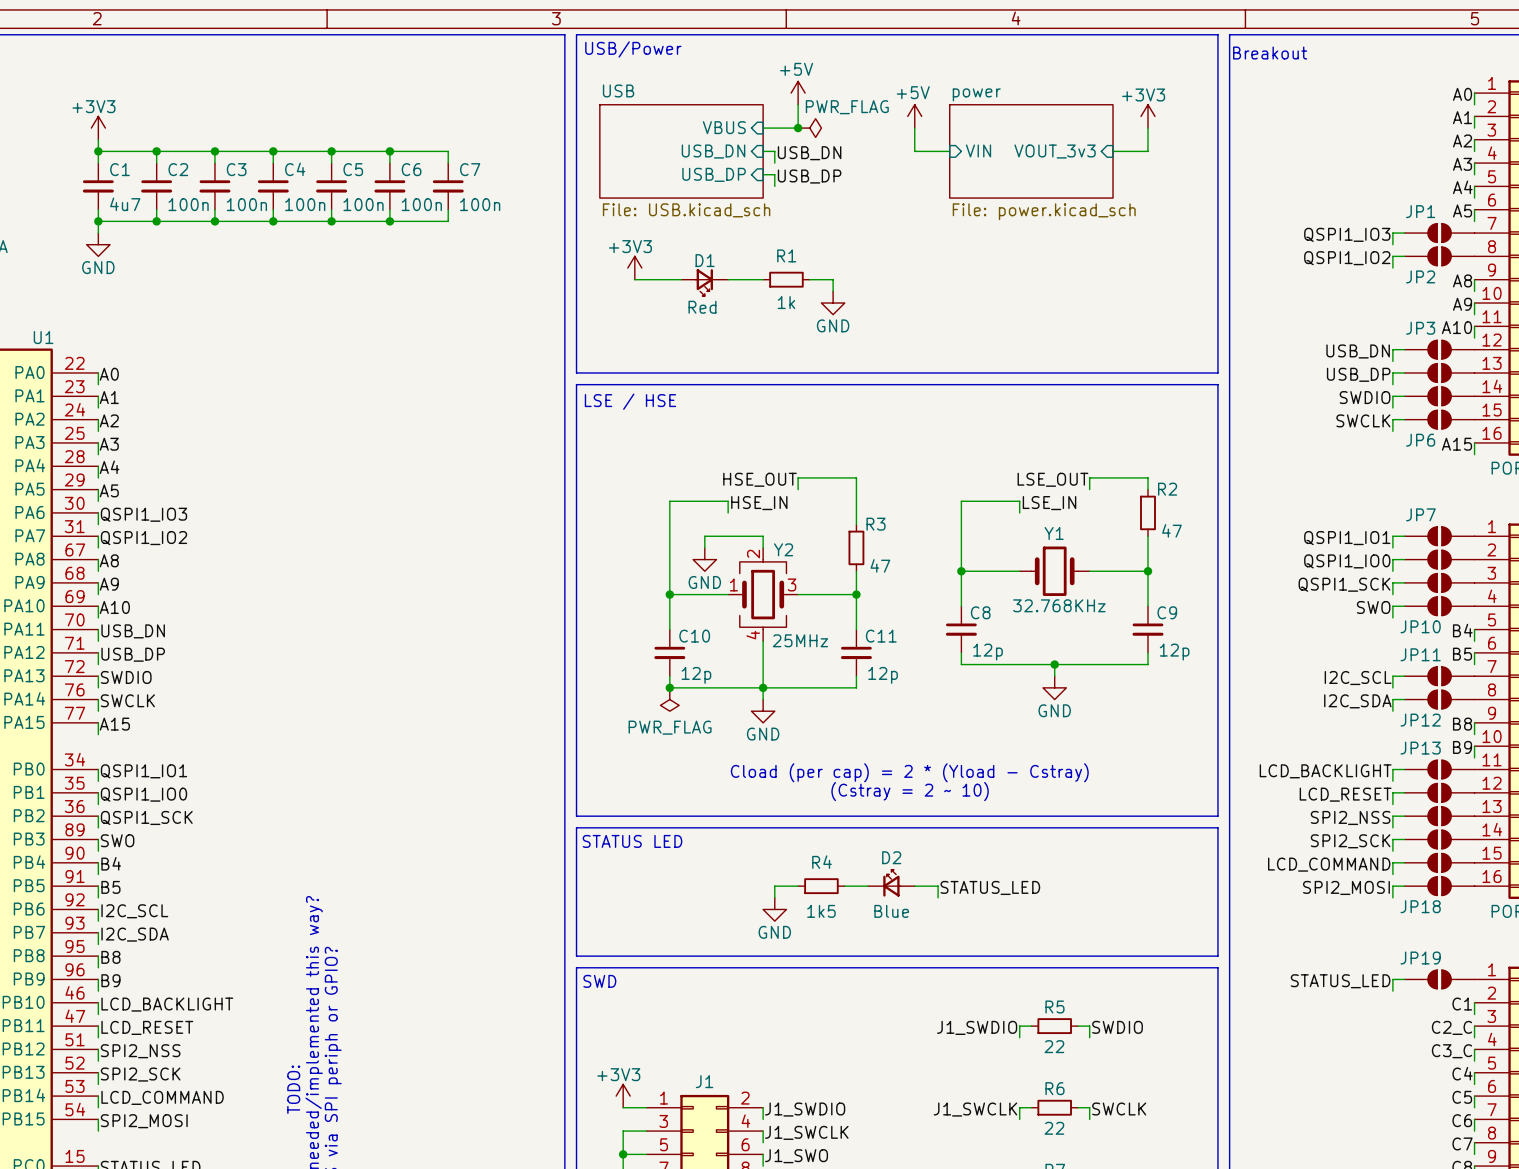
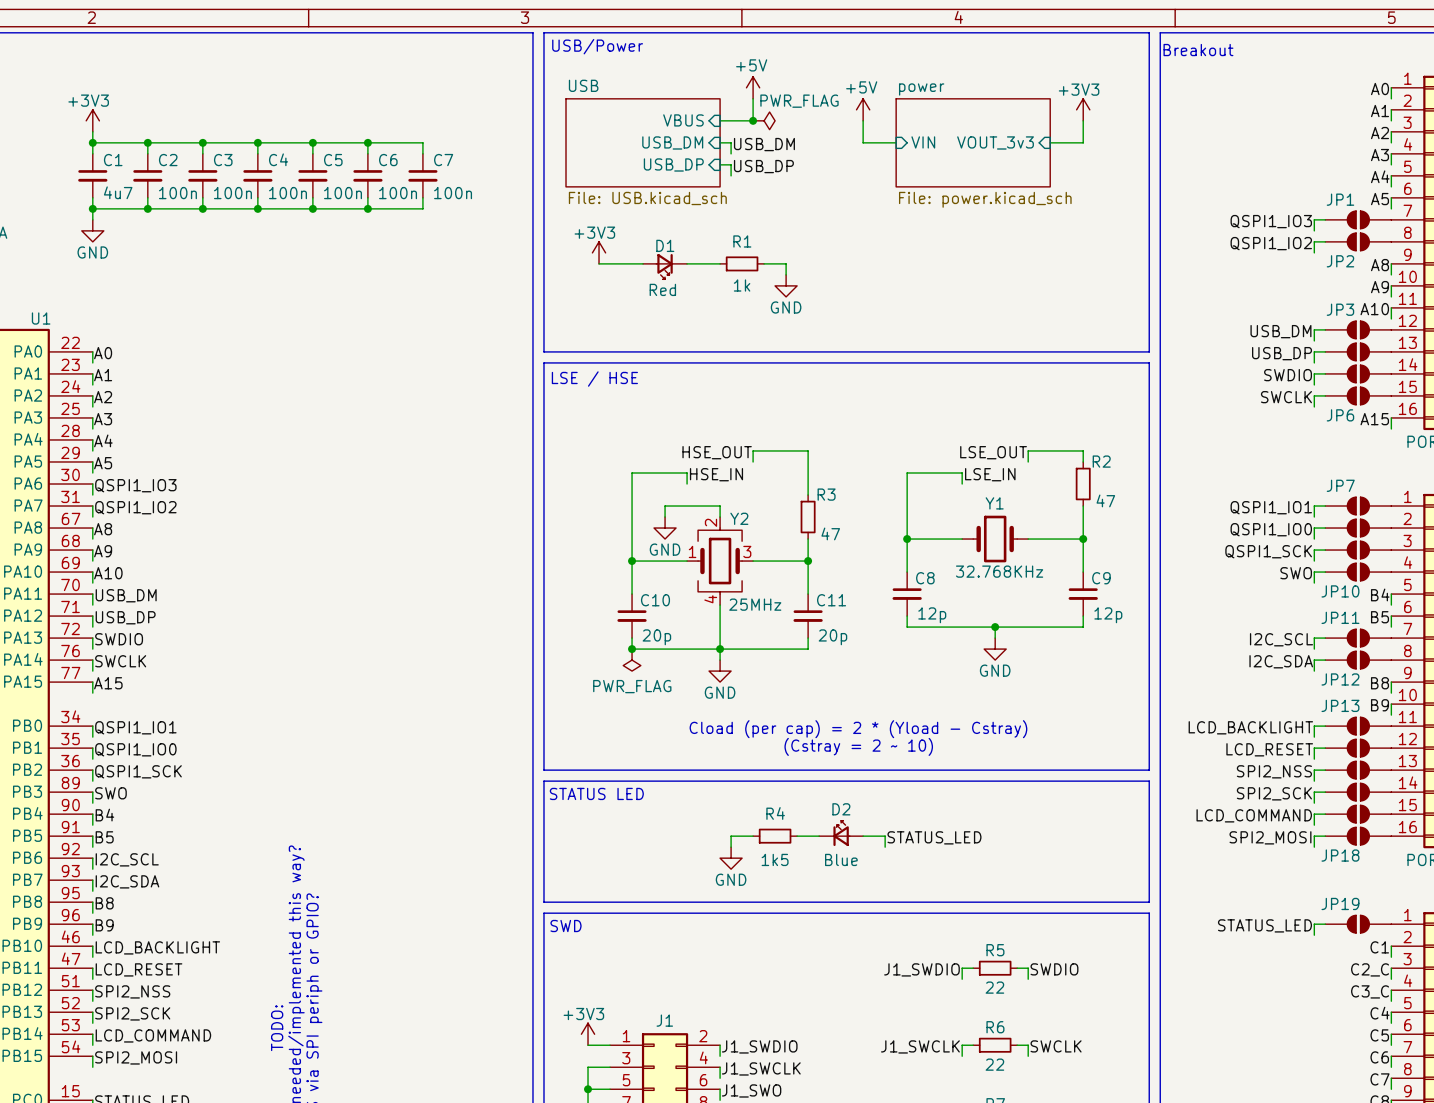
sheet pin: USB_DN (713, 151) -> USB_DM (672, 142)
label: USB_DN (809, 153) -> USB_DM (764, 144)
label: USB_DN (1358, 351) -> USB_DM (1280, 331)
label: USB_DN (133, 631) -> USB_DM (126, 595)
C10 value: 12p (696, 675) -> 20p (656, 637)
C11 value: 12p (883, 675) -> 20p (832, 637)

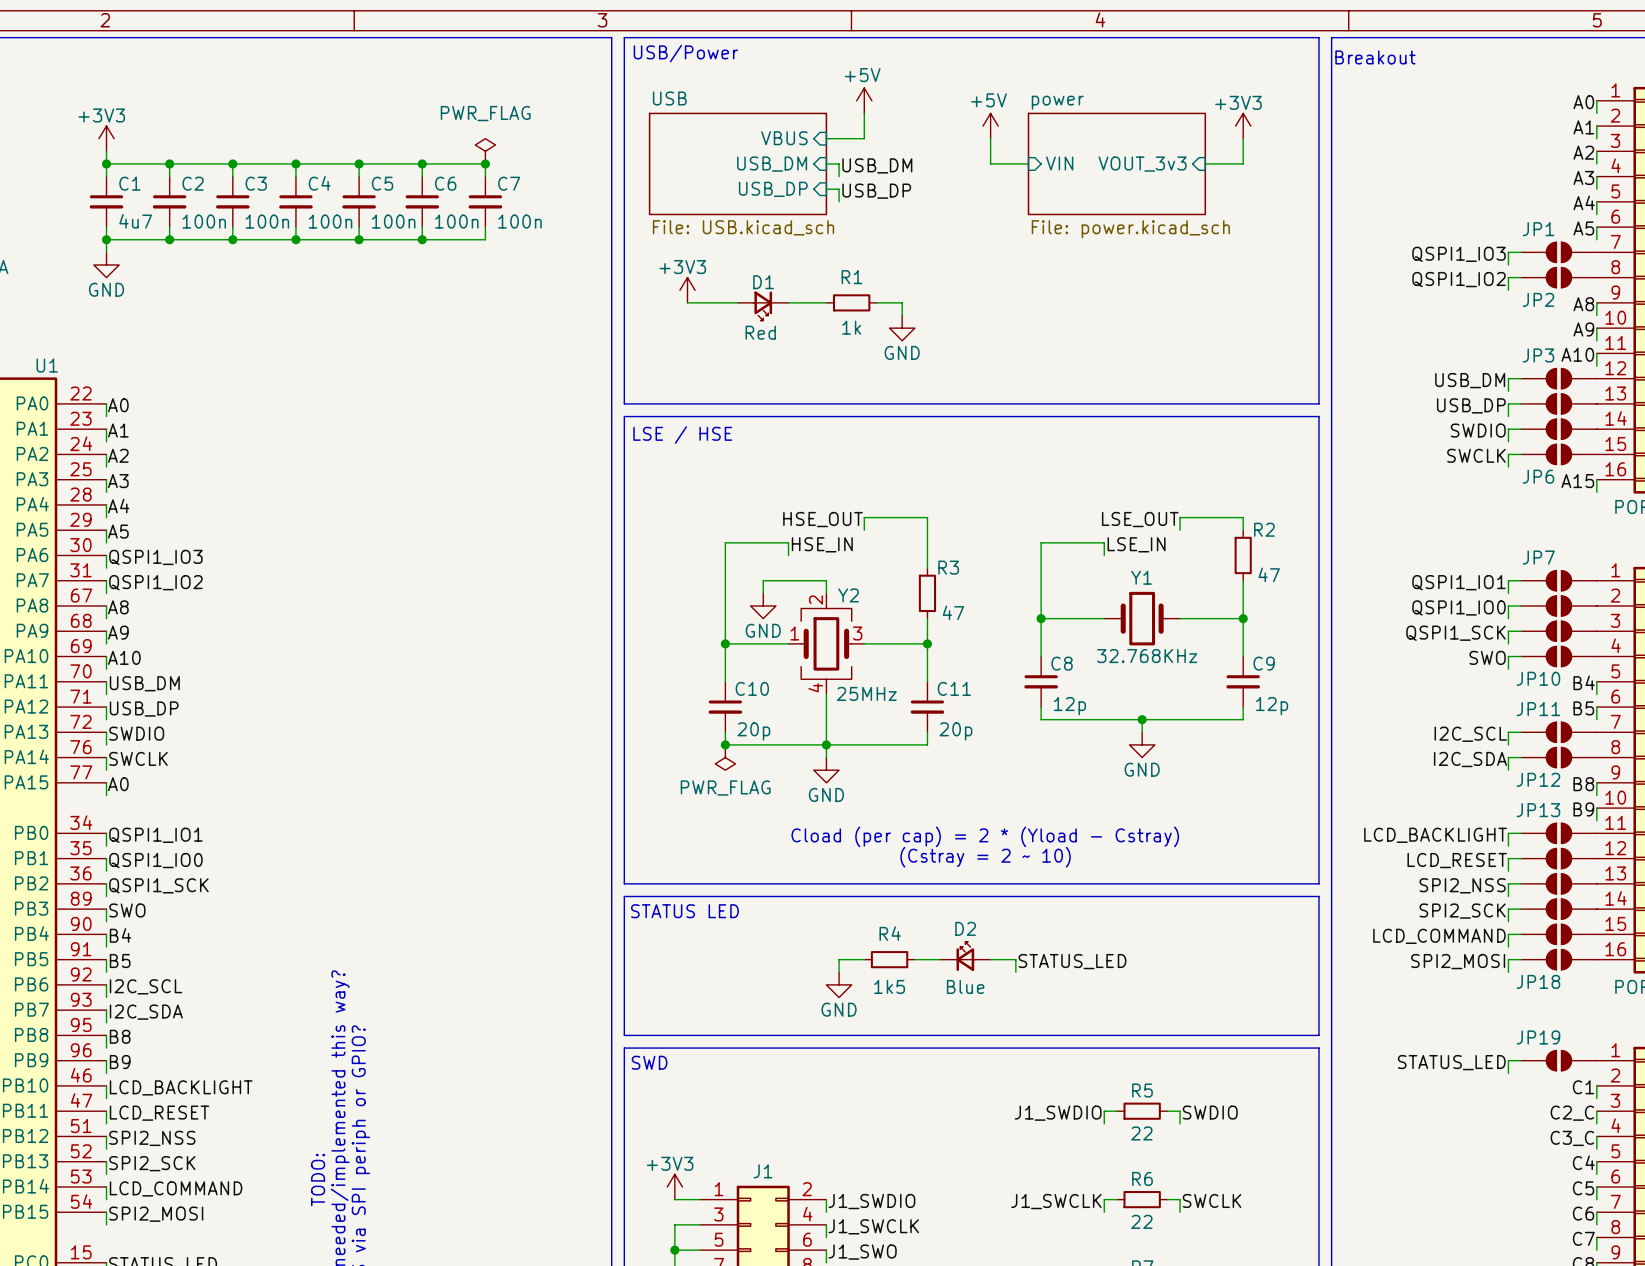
junction: (753, 120) -> none
power symbol: PWR_FLAG (764, 120) -> none
power symbol: none -> PWR_FLAG (485, 151)
junction: none -> (485, 163)
label: A15 (108, 683) -> A0 (118, 784)

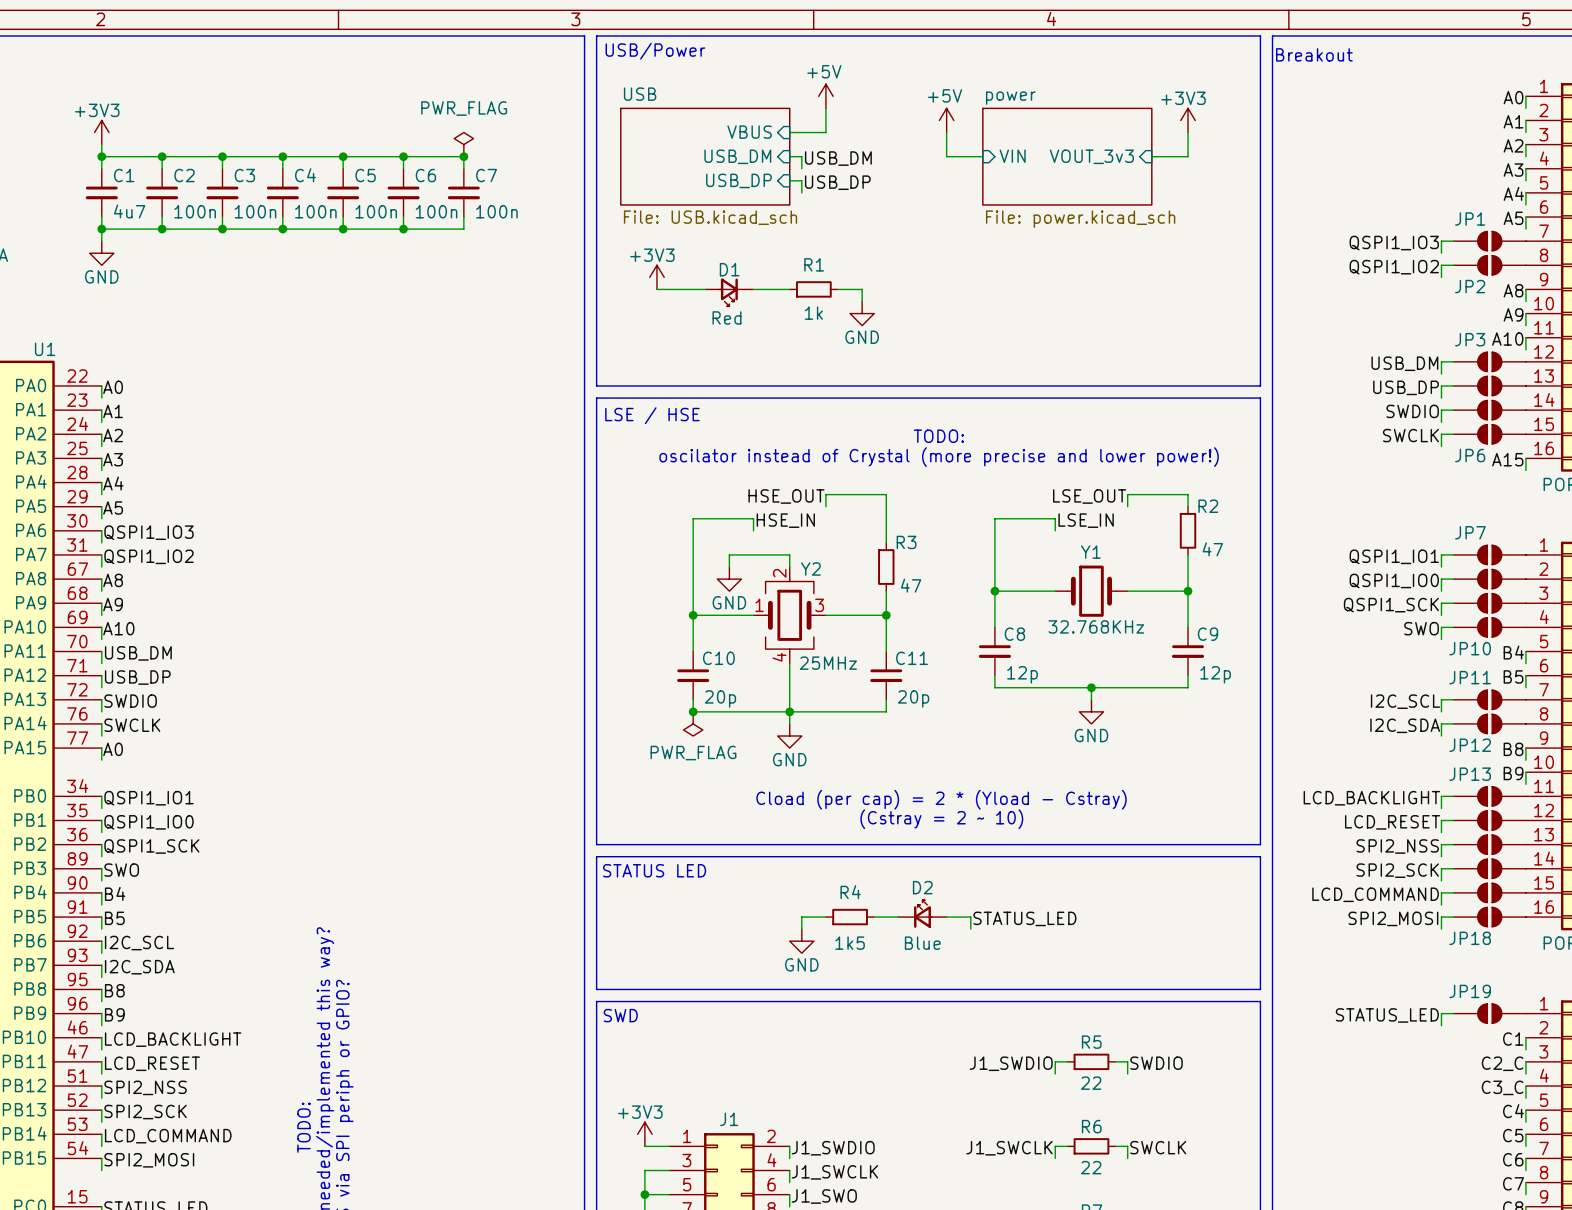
text: none -> TODO: (938, 436)
text: none -> oscilator instead of Crystal (more precise and lower power!) (939, 457)

